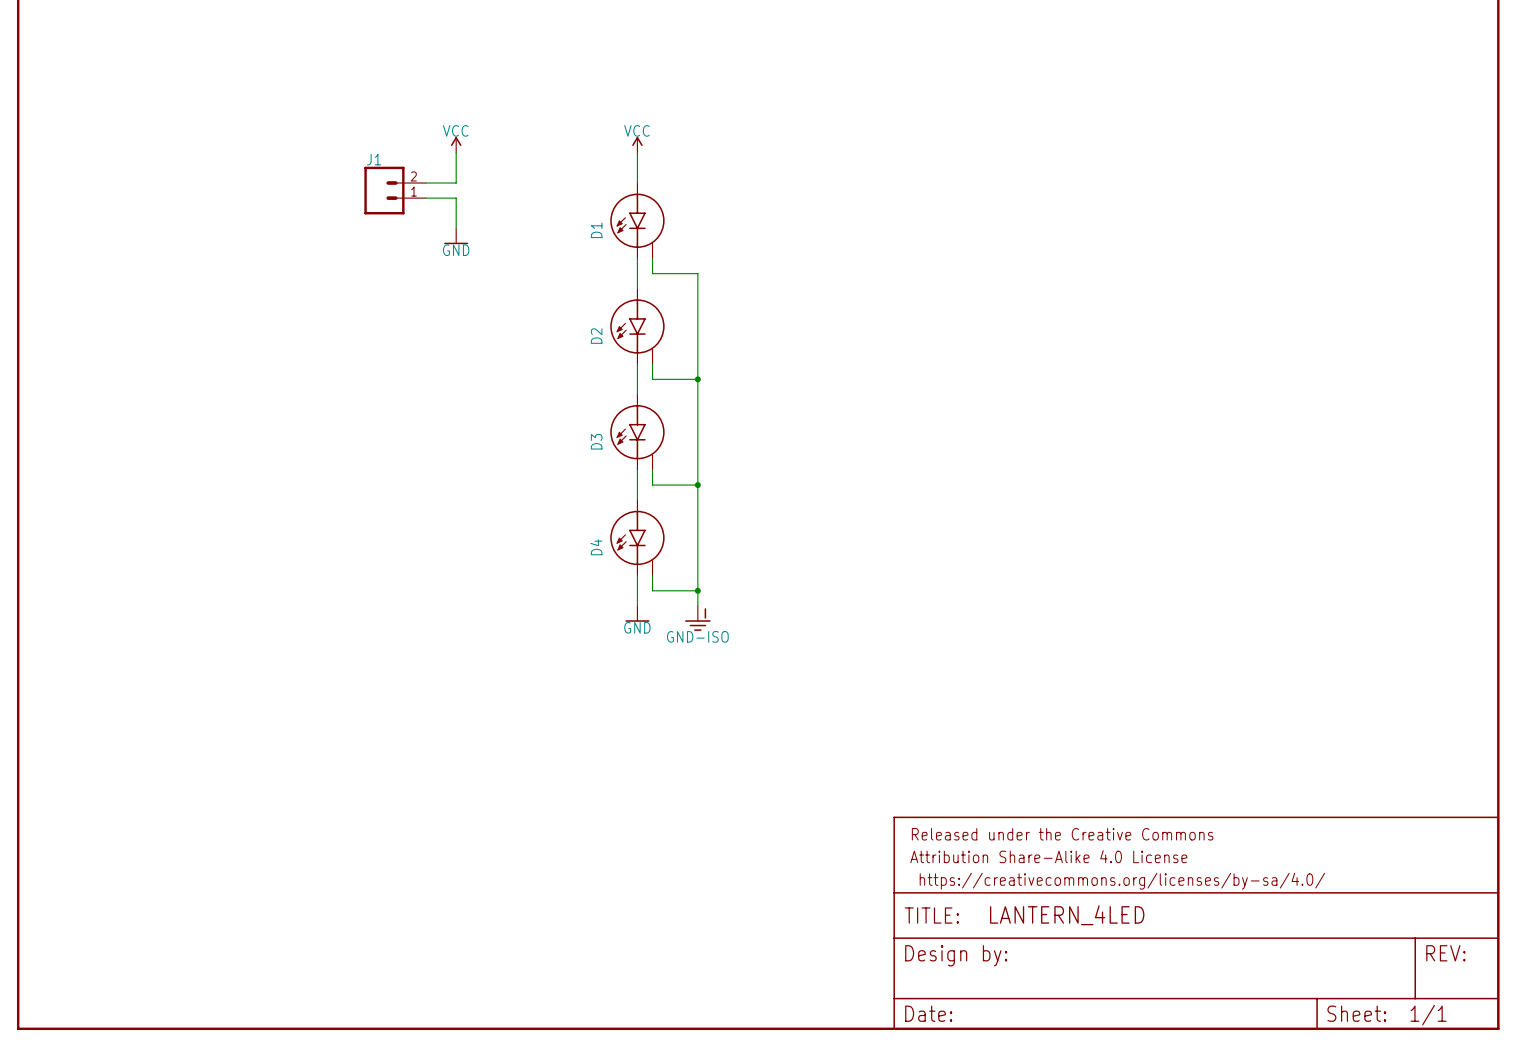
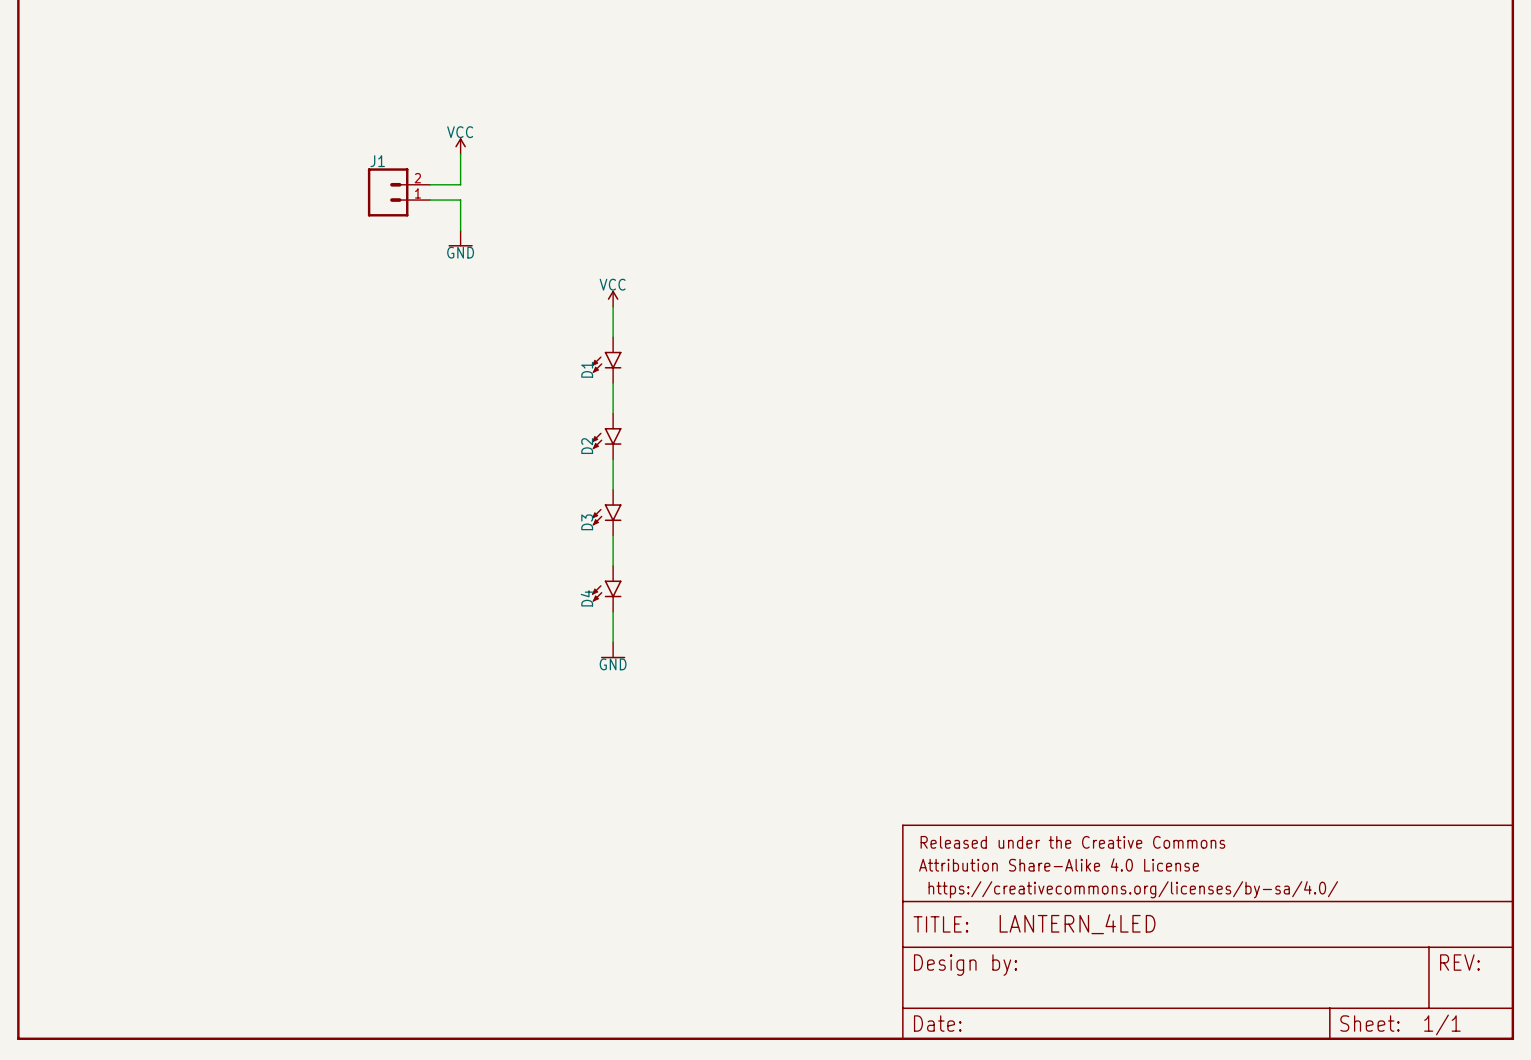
power symbol: VCC (637, 144) -> none
wire: (637, 152) (637, 183) -> none
D1 symbol: [610, 183, 665, 259] -> [592, 337, 622, 384]
D1 name position: D1 (596, 230) -> D1 (587, 369)
wire: (637, 258) (637, 288) -> (613, 306) (613, 337)
wire: (652, 258) (652, 273) (697, 273) (697, 605) -> none
D2 symbol: [610, 288, 665, 365] -> [592, 413, 622, 460]
power symbol: none -> VCC (613, 298)
D2 name position: D2 (596, 336) -> D2 (587, 446)
wire: (637, 364) (637, 394) -> (613, 383) (613, 413)
wire: (652, 364) (652, 379) (697, 379) -> none
junction: (697, 379) -> none
D3 symbol: [610, 394, 665, 470] -> [592, 489, 622, 536]
D3 name position: D3 (596, 441) -> D3 (587, 522)
wire: (637, 469) (637, 500) -> (613, 459) (613, 489)
wire: (652, 469) (652, 485) (697, 485) -> none
junction: (697, 485) -> none
D4 symbol: [610, 500, 665, 576] -> [592, 566, 622, 612]
wire: none -> (613, 535) (613, 566)
D4 name position: D4 (596, 547) -> D4 (586, 598)
wire: (637, 575) (637, 605) -> (613, 611) (613, 642)
wire: (652, 575) (652, 590) (697, 590) -> none
junction: (697, 590) -> none
power symbol position: GND (637, 613) -> GND (613, 650)
power symbol: GND-ISO (697, 618) -> none

